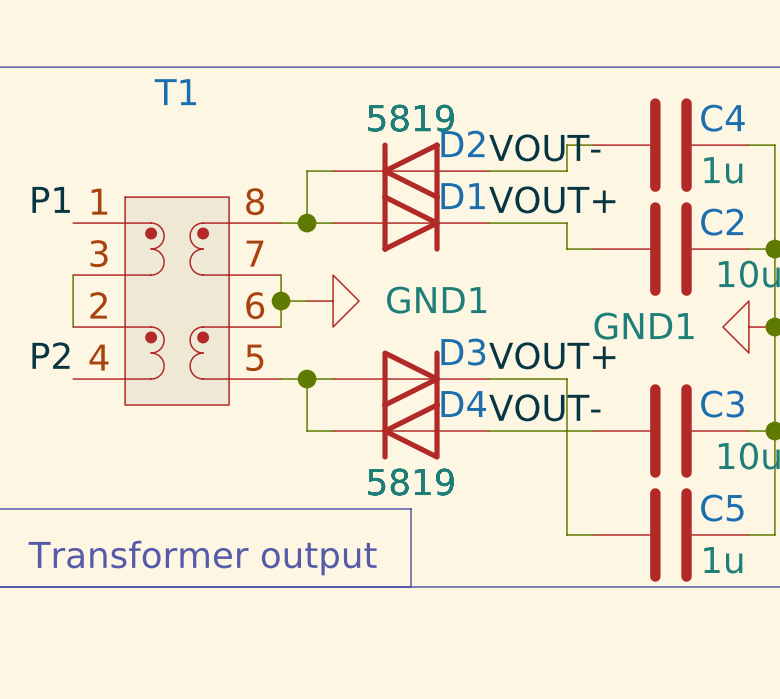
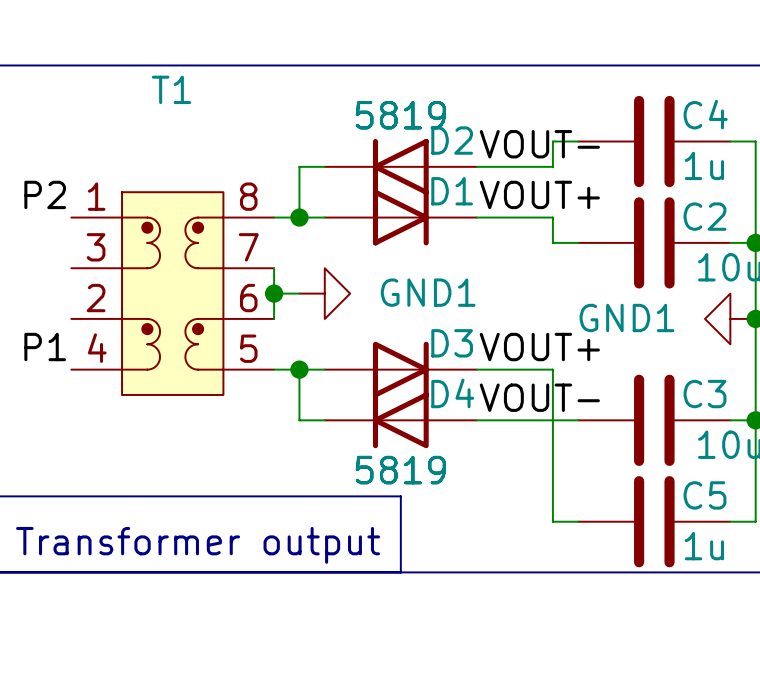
label: P1 (51, 199) -> P2 (45, 194)
wire: (73, 275) (73, 327) -> none
label: P2 (51, 355) -> P1 (45, 347)

